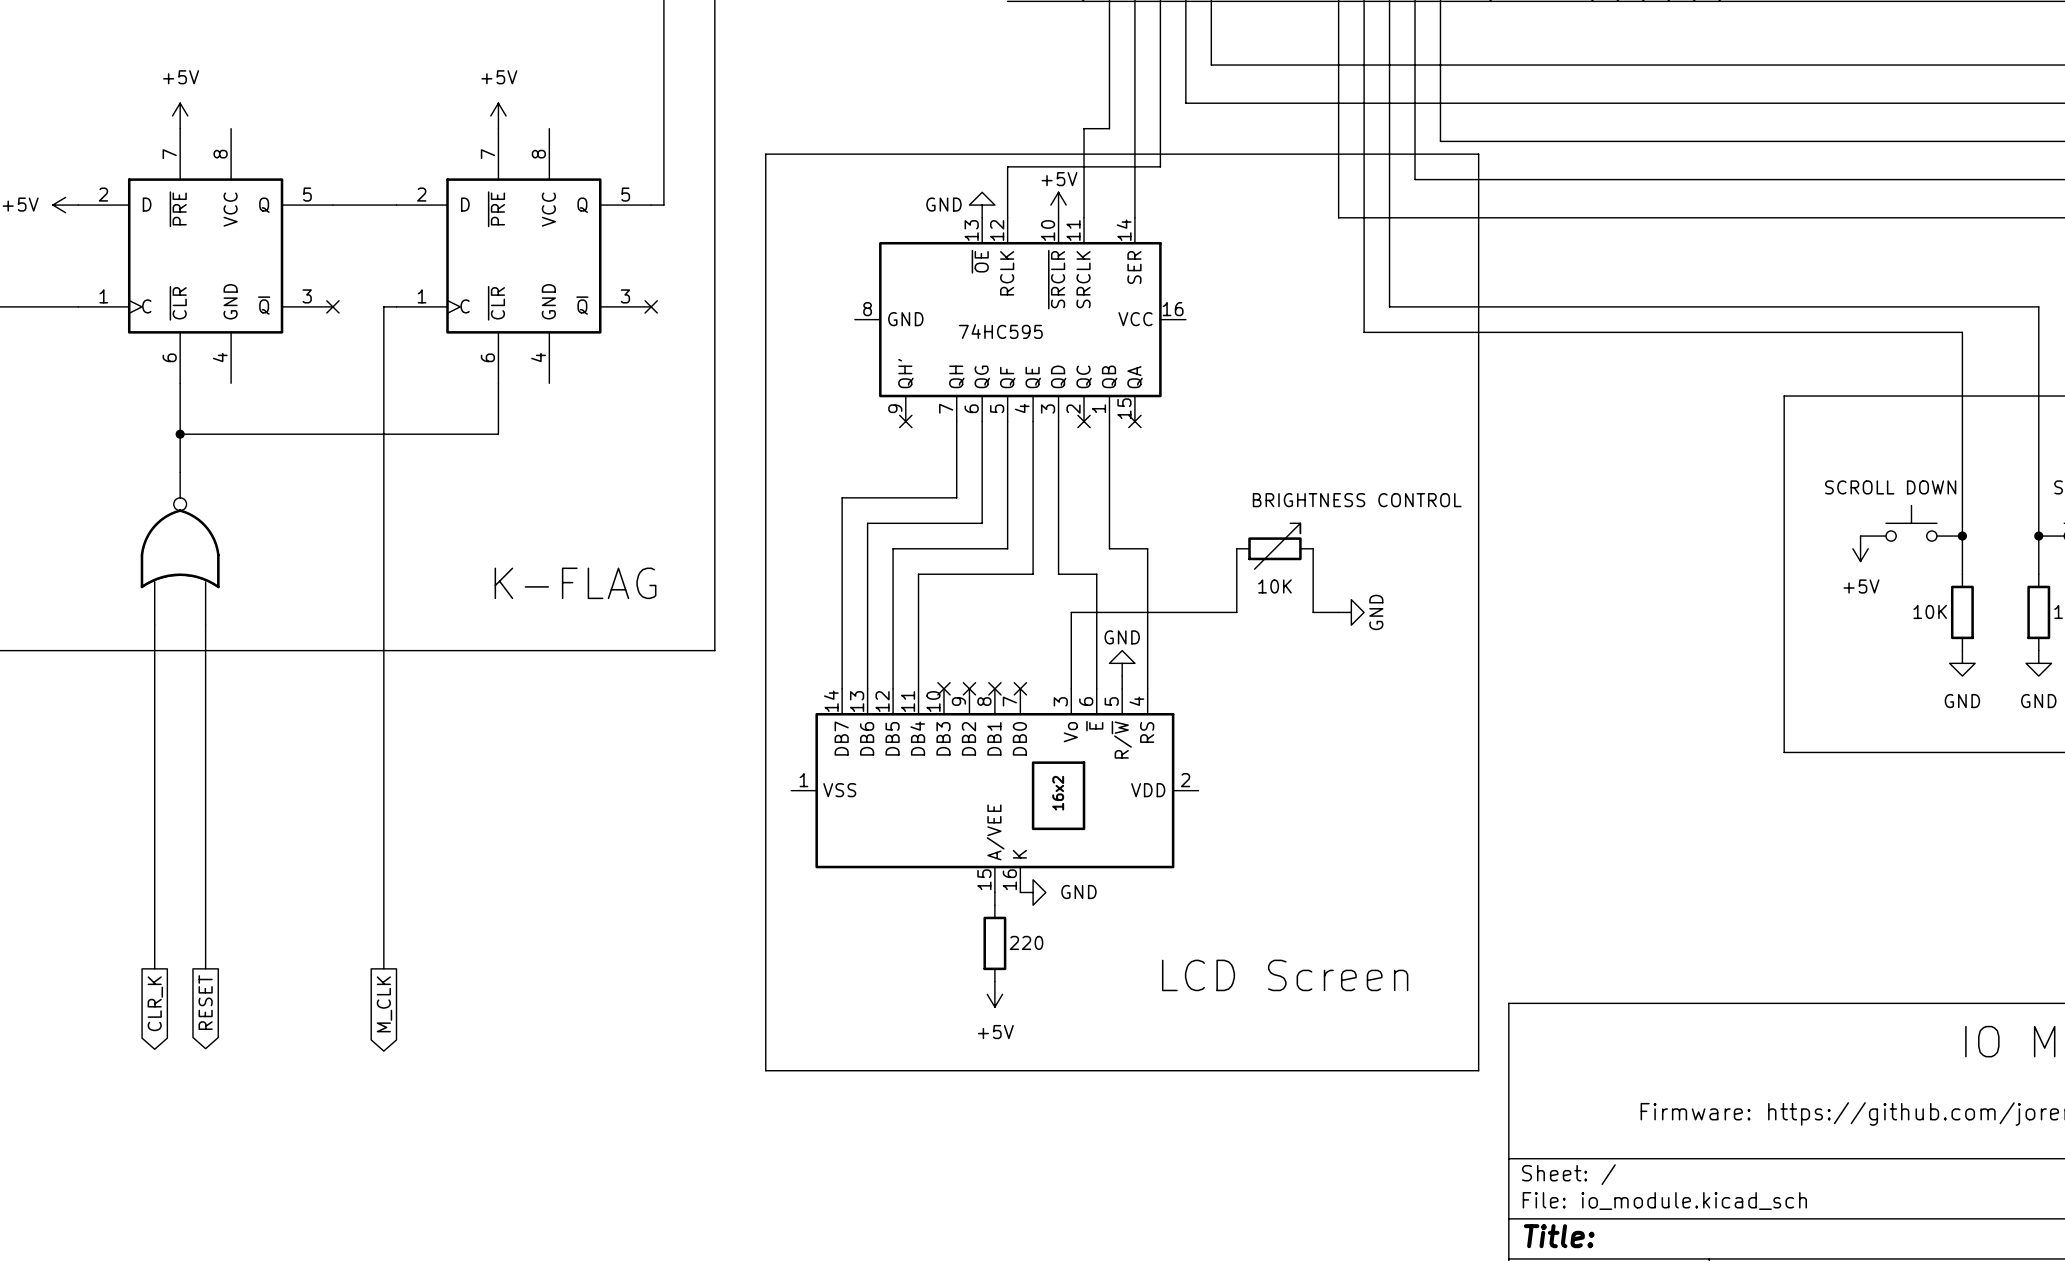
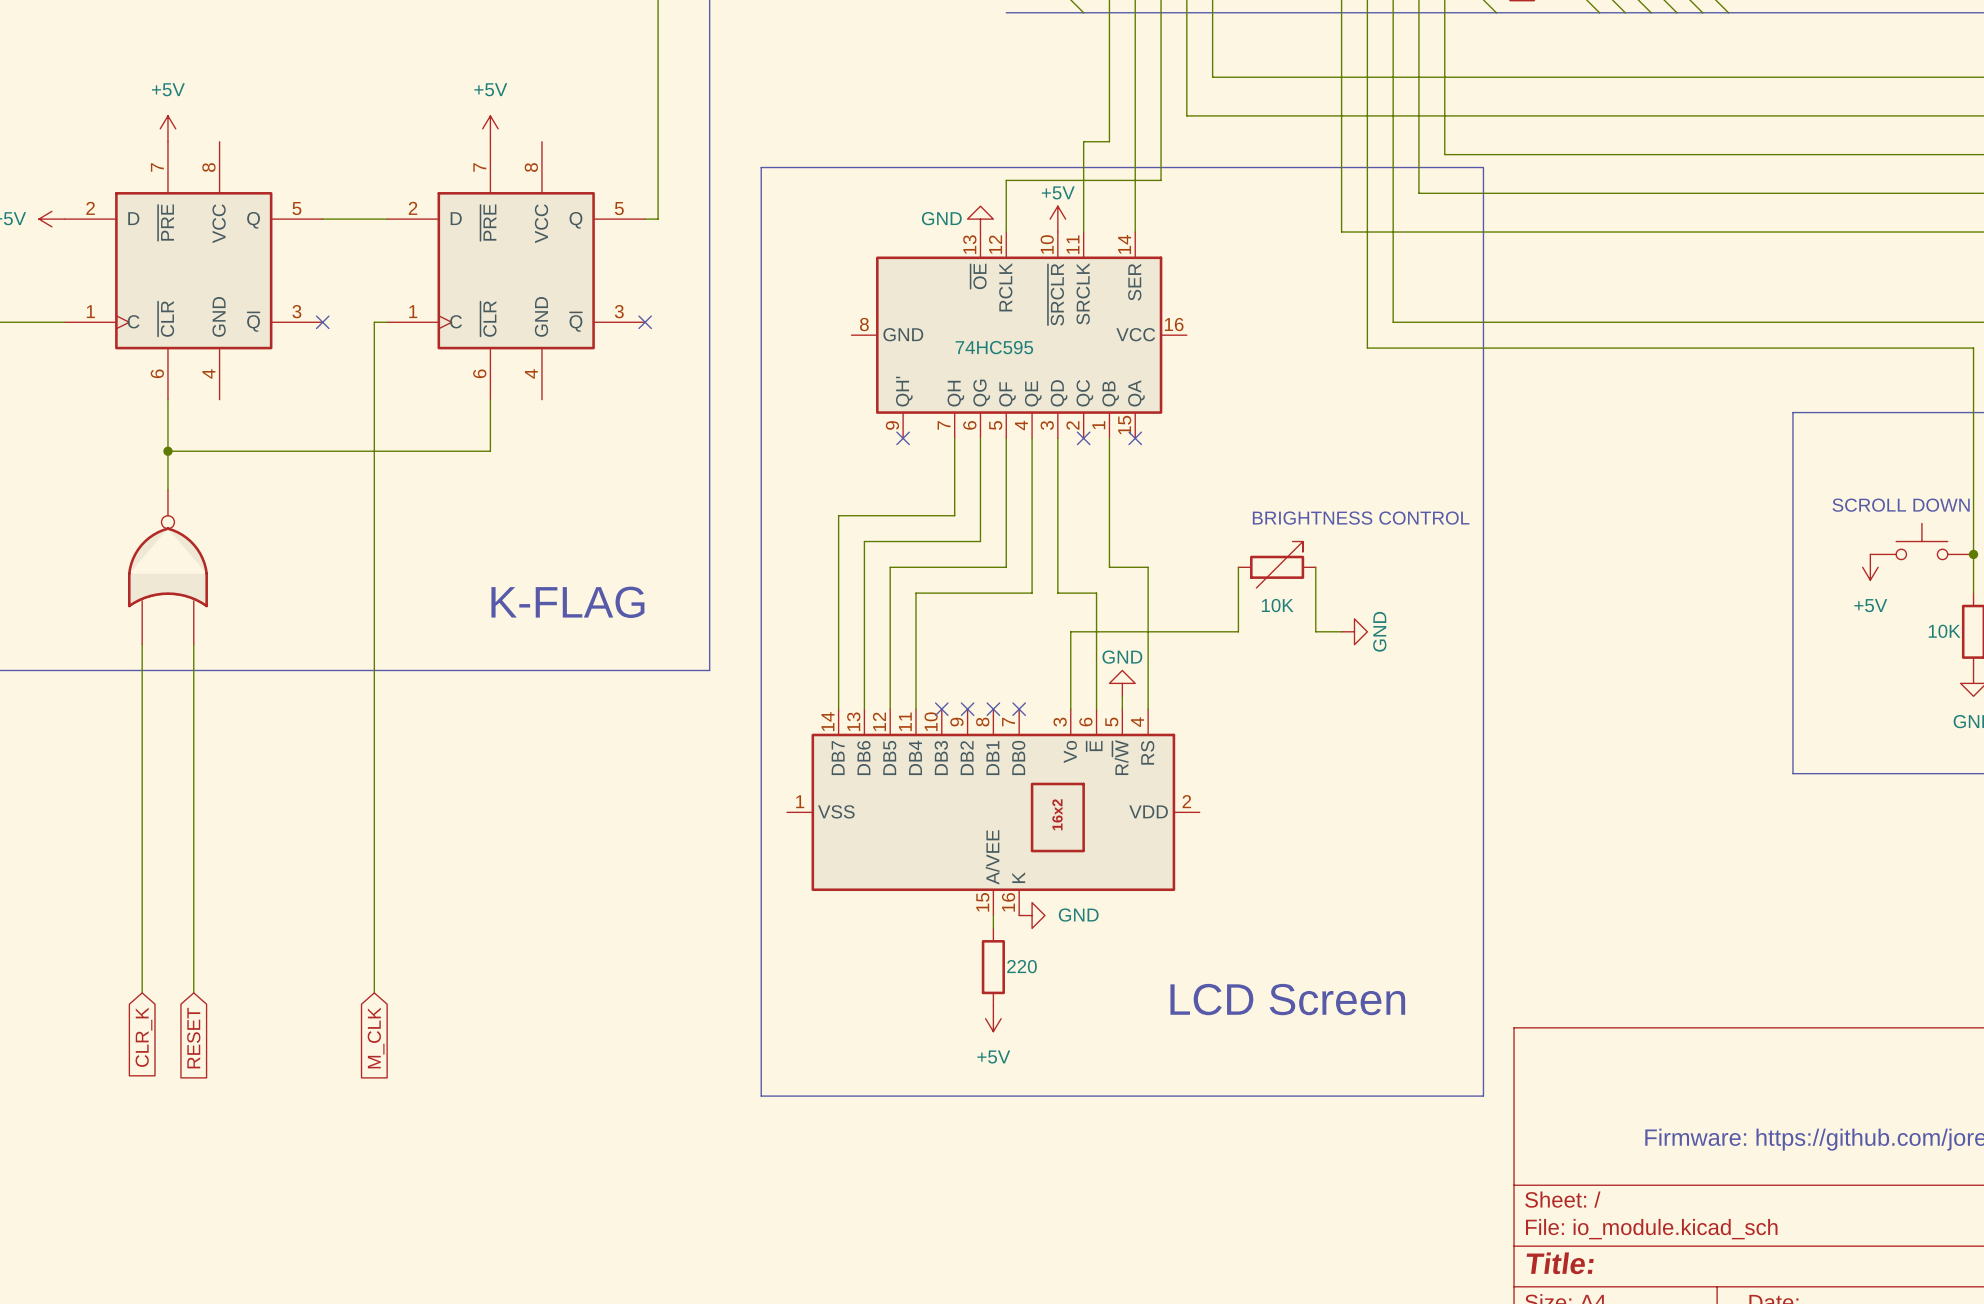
global label shape: output (205, 1002) -> input (193, 1038)
global label shape: output (155, 1003) -> input (143, 1037)
global label shape: output (384, 1004) -> input (376, 1038)

